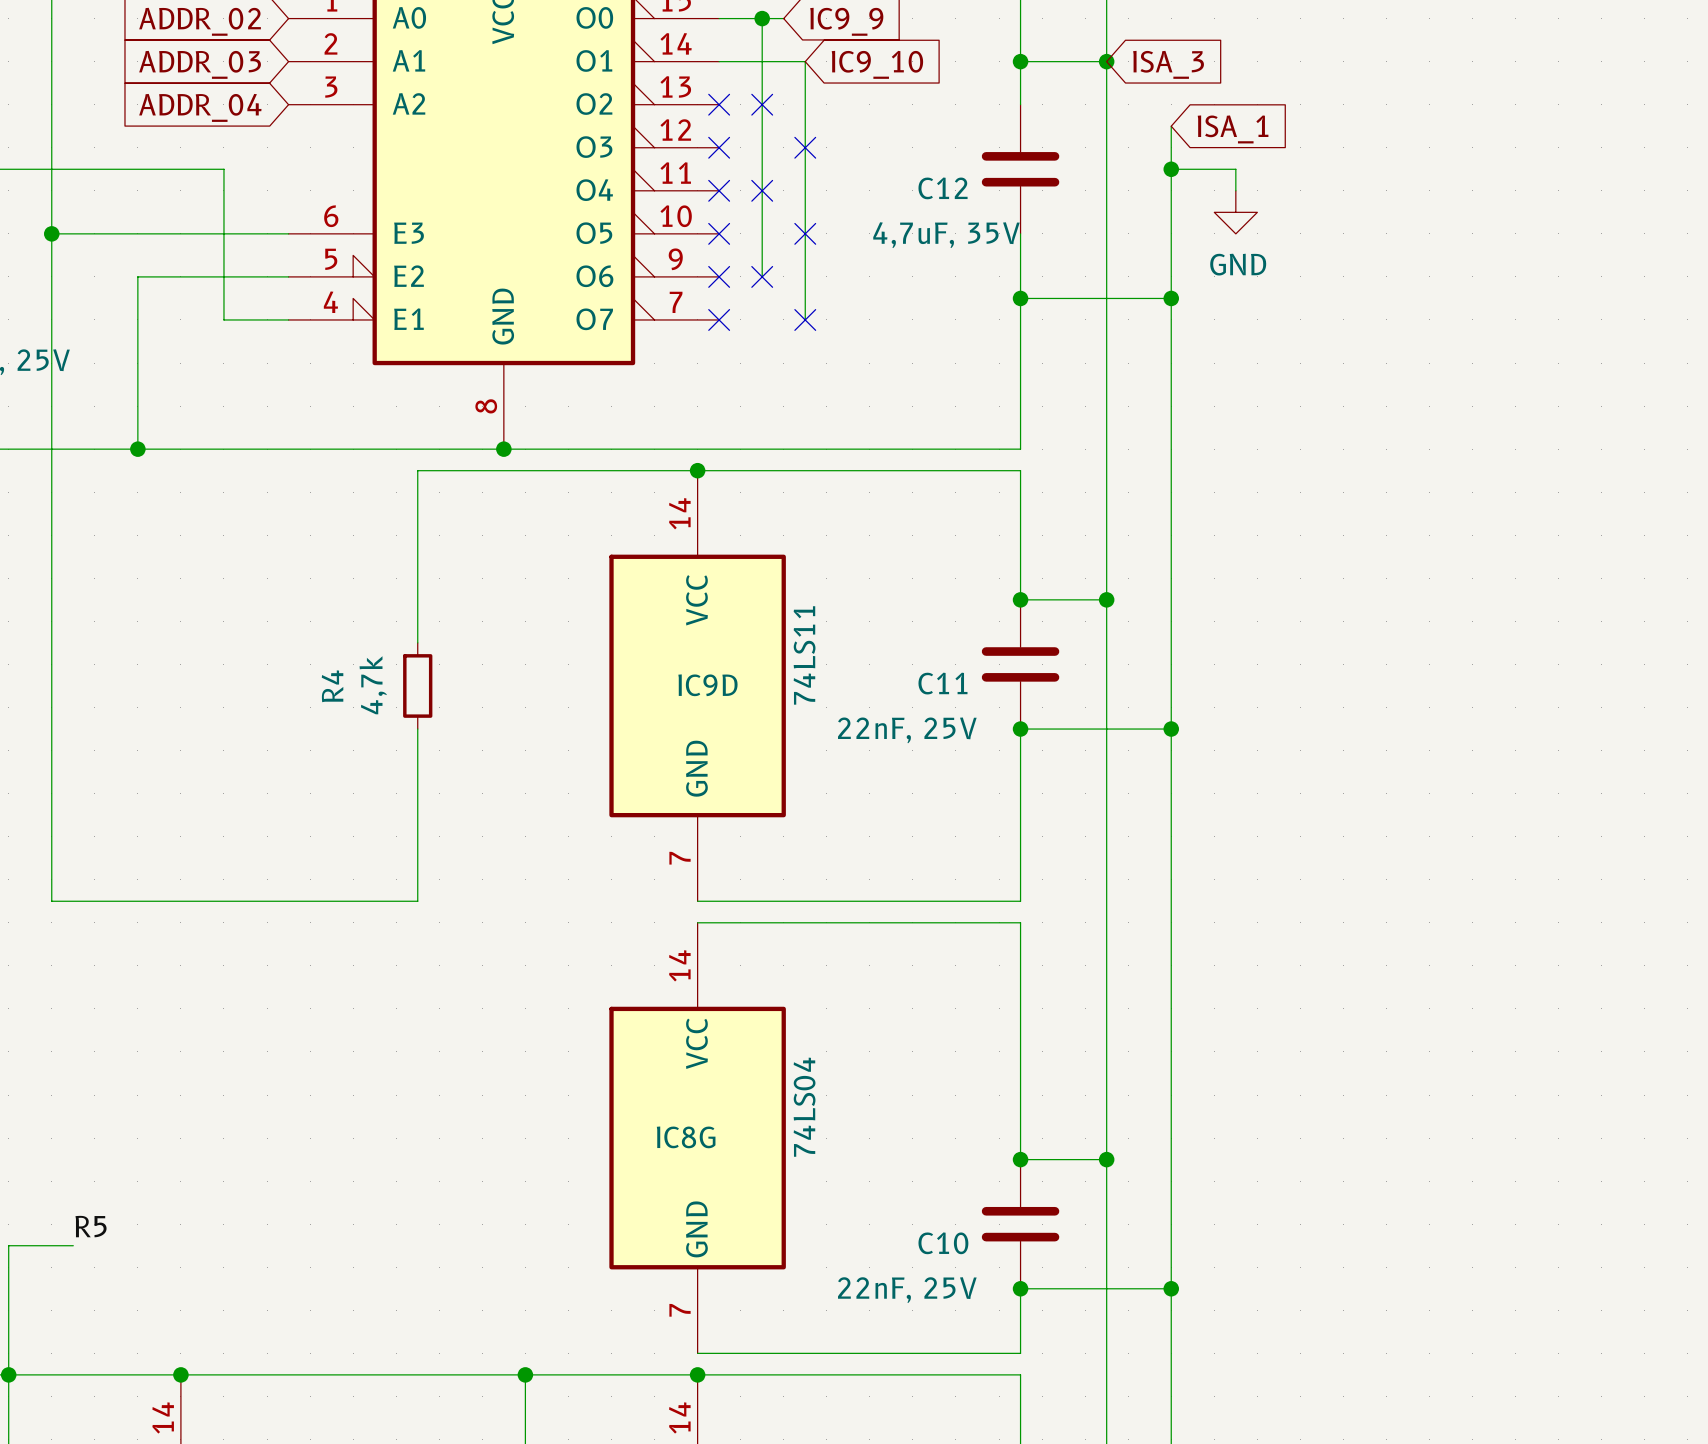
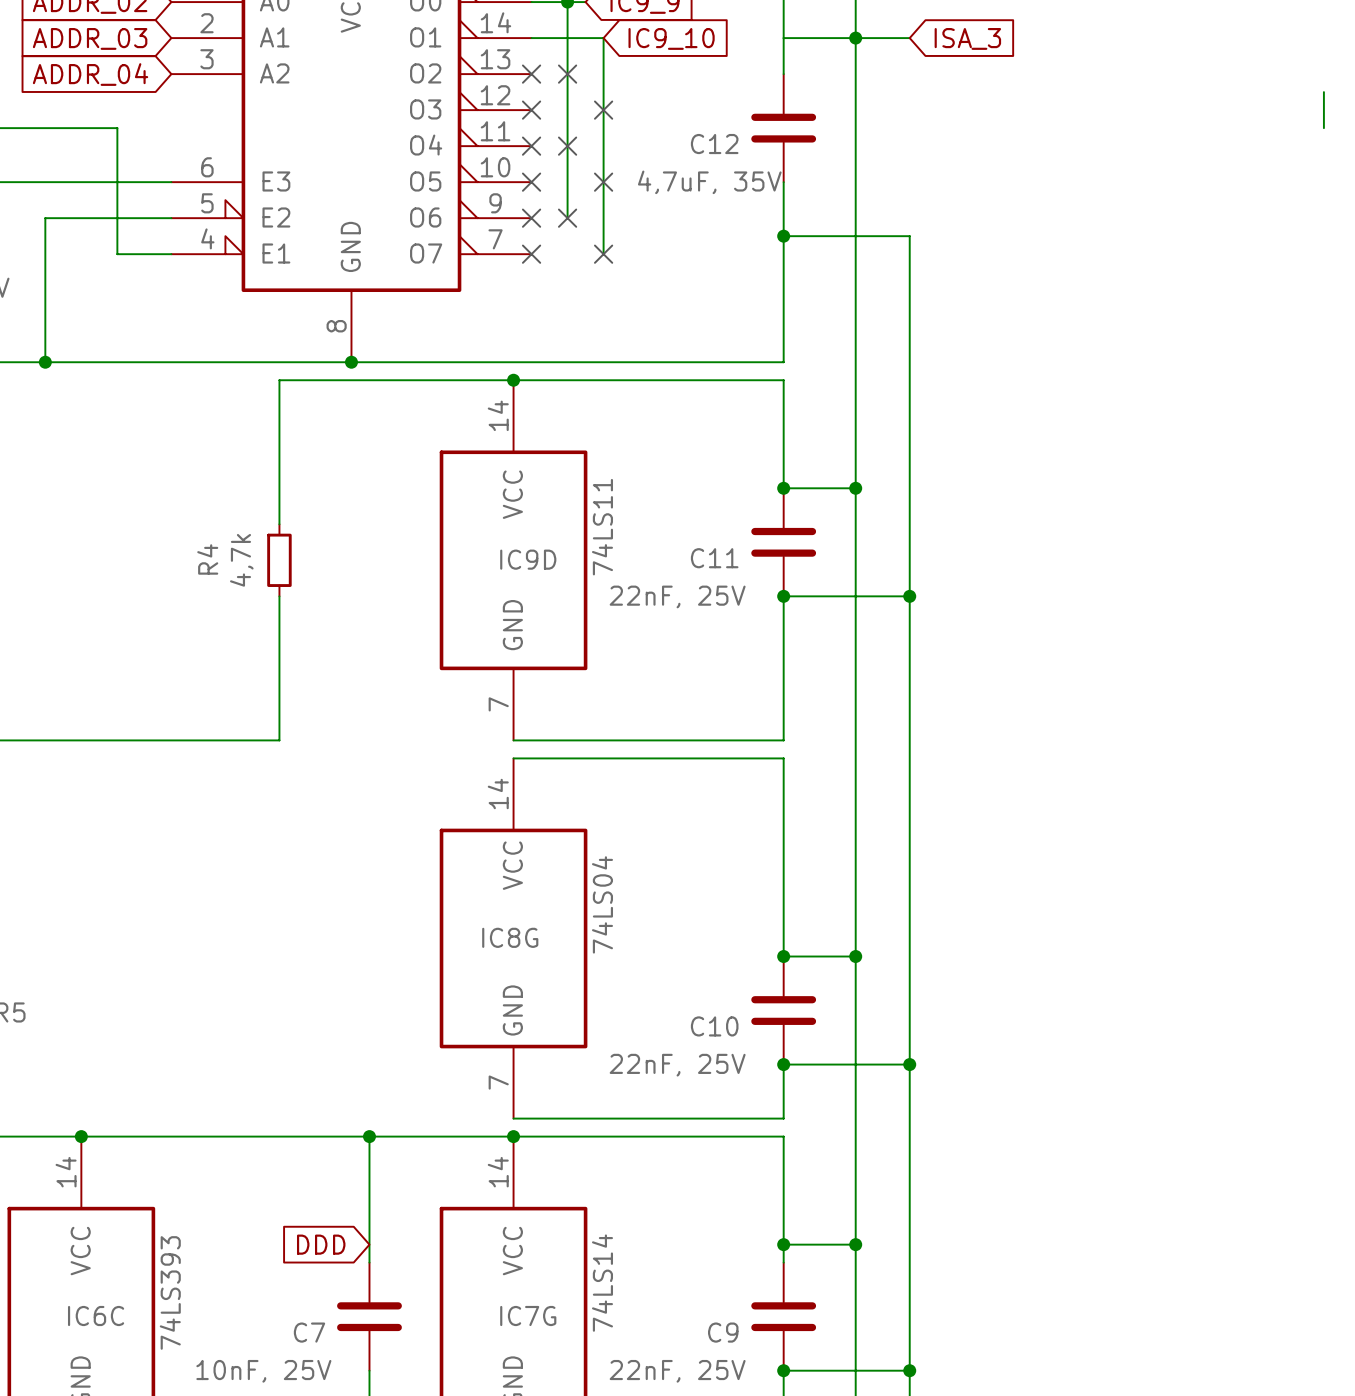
junction: (1020, 61) -> none
wire: none -> (855, 38) (909, 38)
global label position: ISA_3 (1168, 64) -> ISA_3 (967, 38)
wire: (1171, 126) (1171, 298) -> none
wire: none -> (1323, 92) (1323, 128)
global label: ISA_1 (1233, 129) -> none
wire: (1171, 169) (1235, 169) (1235, 190) -> none
junction: (1171, 169) -> none
power symbol: GND (1235, 212) -> none
junction: (1171, 298) -> none

